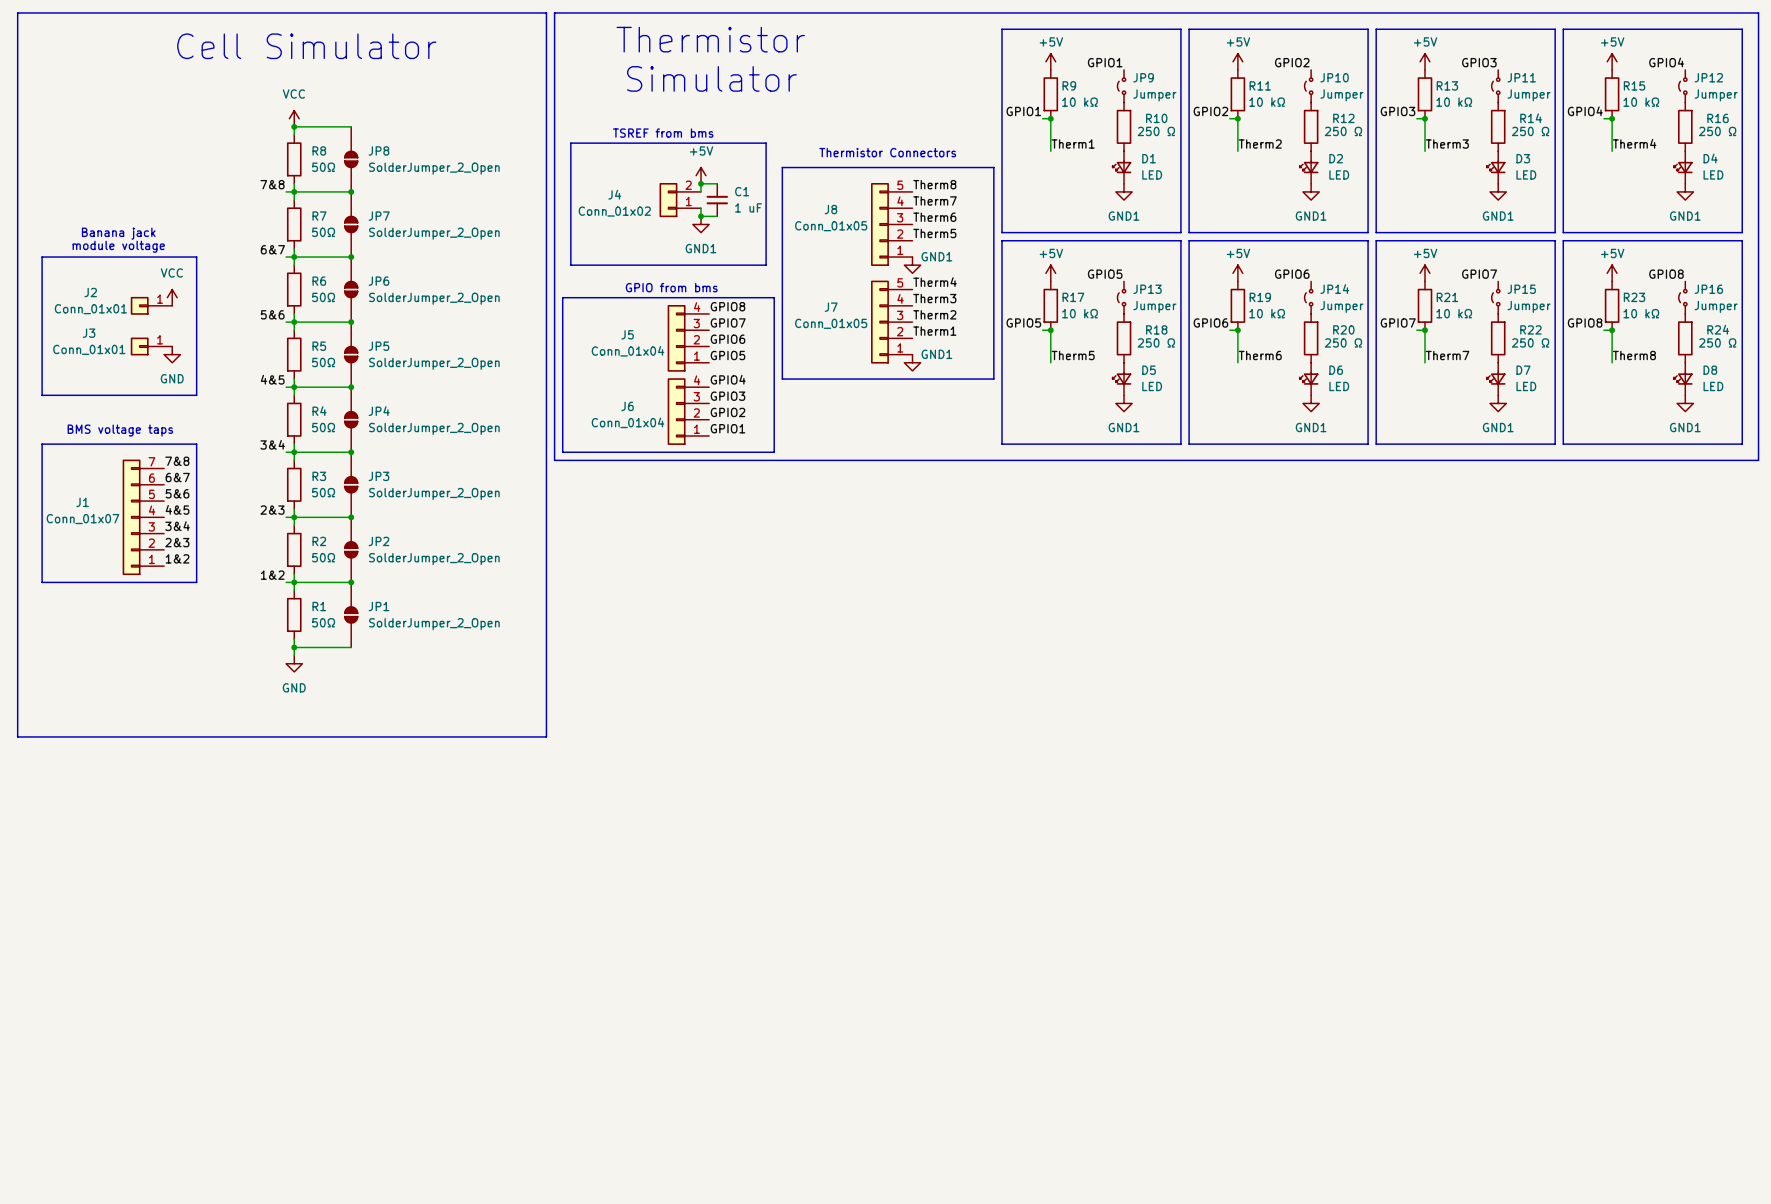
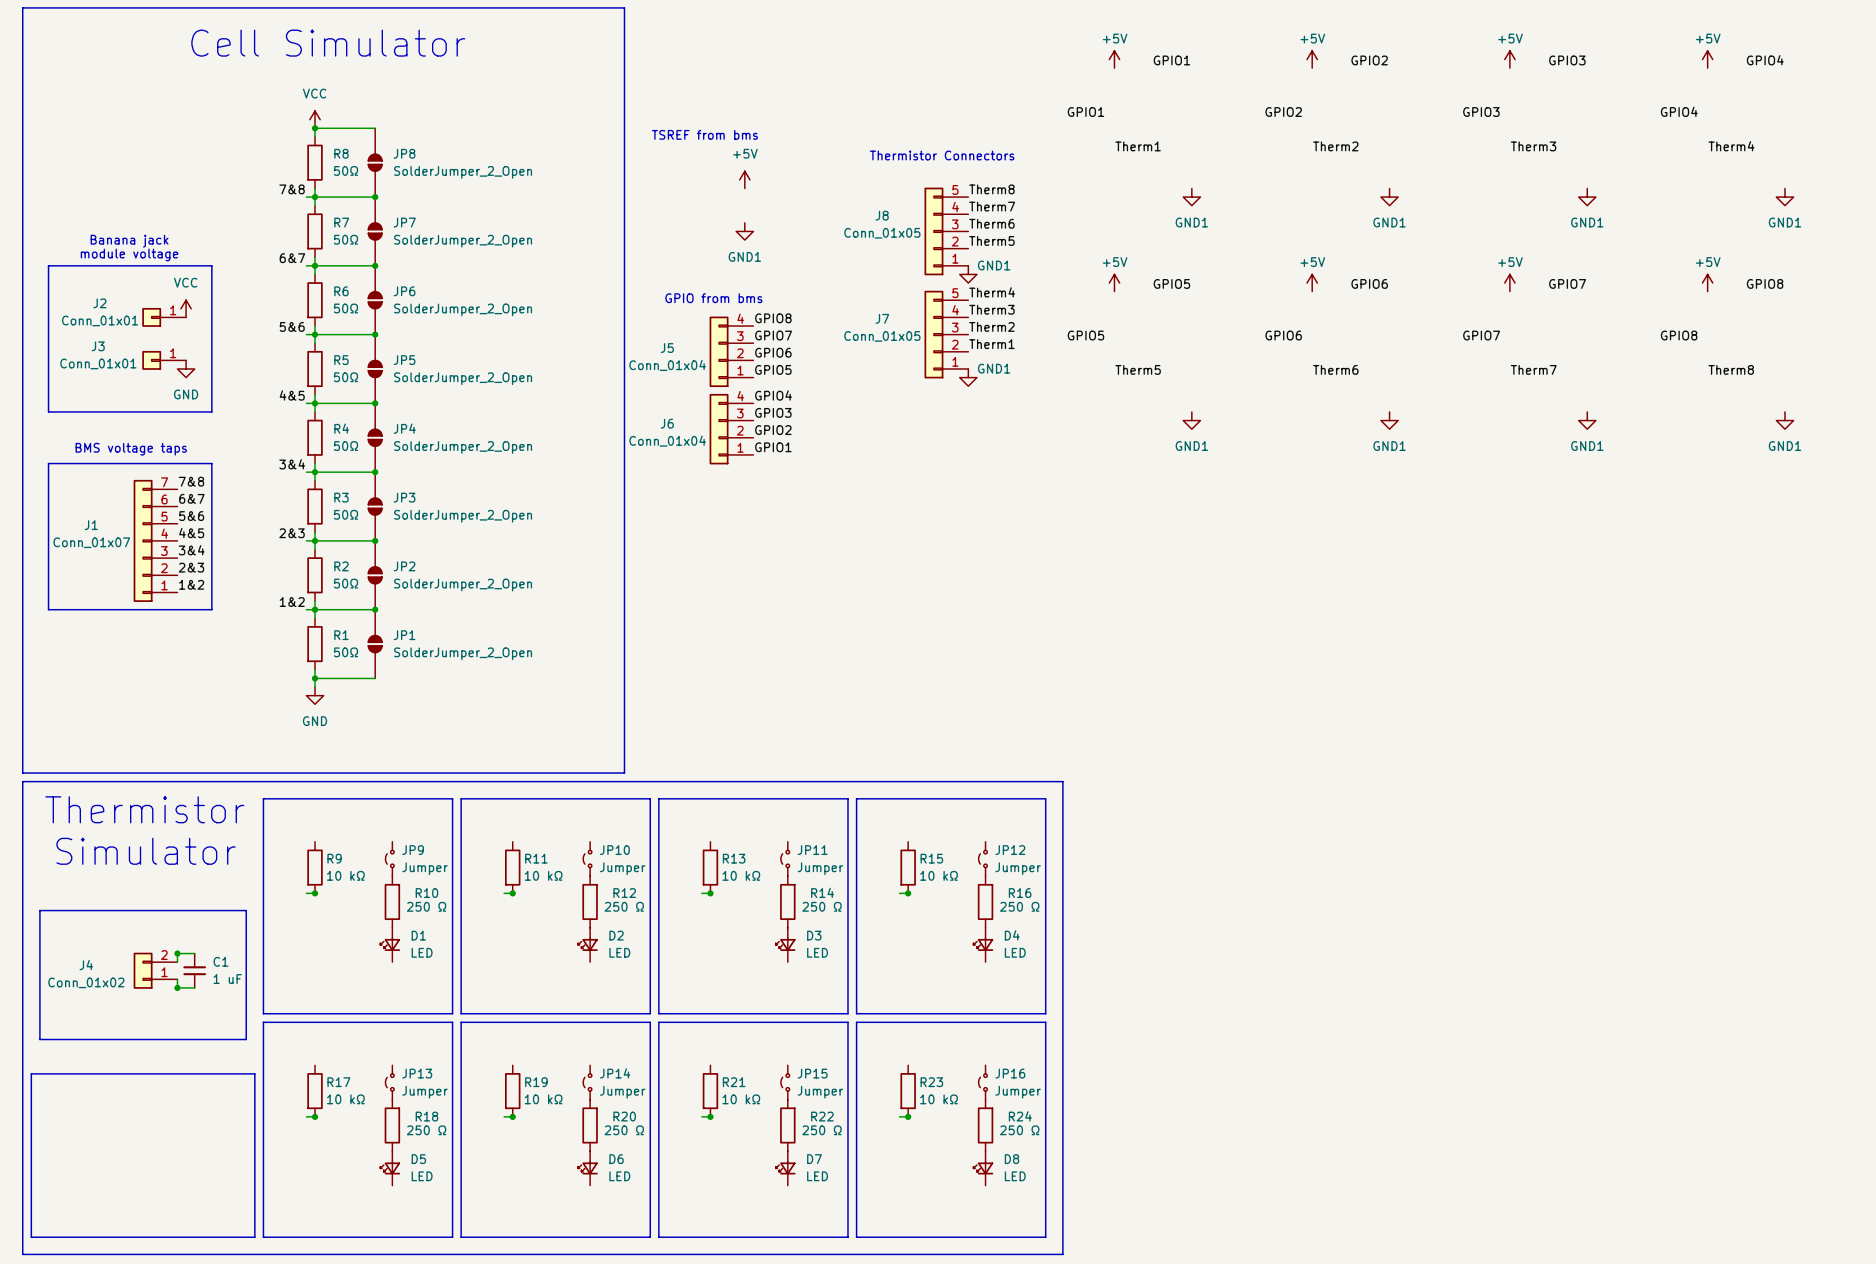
line: (546, 12) (546, 736) -> (624, 7) (624, 773) (581, 773)
line: (554, 12) (554, 460) (1758, 460) (1758, 12) (587, 12) -> (590, 7) (581, 7)
line: (1001, 29) (1180, 29) (1180, 232) (1001, 232) (1001, 29) -> none
line: (1189, 29) (1368, 29) (1368, 232) (1189, 232) (1189, 29) -> none
line: (1376, 29) (1555, 29) (1555, 232) (1376, 232) (1376, 29) -> none
line: (1563, 29) (1742, 29) (1742, 232) (1563, 232) (1563, 29) -> none
text: Thermistor (710, 39) -> none
text: Simulator (711, 78) -> none
JP9 position: (1121, 86) -> (389, 858)
JP10 position: (1308, 86) -> (587, 858)
JP11 position: (1495, 86) -> (785, 858)
JP12 position: (1682, 86) -> (982, 858)
R9 position: (1050, 94) -> (315, 867)
R11 position: (1237, 94) -> (512, 867)
R13 position: (1424, 94) -> (710, 867)
R15 position: (1612, 94) -> (908, 867)
wire: (1042, 118) (1050, 118) (1050, 151) -> none
junction: (1050, 118) -> none
wire: (1229, 118) (1237, 118) (1237, 151) -> none
junction: (1237, 118) -> none
wire: (1416, 118) (1424, 118) (1424, 151) -> none
junction: (1424, 118) -> none
wire: (1603, 118) (1612, 118) (1612, 151) -> none
junction: (1612, 118) -> none
R10 position: (1124, 126) -> (392, 901)
R12 position: (1311, 126) -> (590, 901)
R14 position: (1498, 126) -> (787, 901)
R16 position: (1685, 126) -> (985, 901)
line: (570, 143) (766, 143) (766, 265) (570, 265) (570, 143) -> none
line: (782, 167) (993, 167) (993, 379) (782, 379) (782, 167) -> none
D1 position: (1121, 167) -> (390, 944)
D2 position: (1309, 167) -> (587, 944)
D3 position: (1496, 167) -> (785, 944)
D4 position: (1683, 167) -> (983, 944)
junction: (701, 183) -> none
wire: (717, 183) (701, 183) (701, 191) -> none
J4 position: (680, 200) -> (155, 970)
C1 position: (717, 200) -> (194, 970)
wire: (701, 208) (701, 216) (717, 216) -> none
junction: (701, 216) -> none
line: (1001, 240) (1180, 240) (1180, 444) (1001, 444) (1001, 240) -> none
line: (1189, 240) (1368, 240) (1368, 444) (1189, 444) (1189, 240) -> none
line: (1376, 240) (1555, 240) (1555, 444) (1376, 444) (1376, 240) -> none
line: (1563, 240) (1563, 444) (1742, 444) (1742, 240) (1563, 240) -> none
line: (562, 297) (774, 297) (774, 452) (562, 452) (562, 297) -> none
JP13 position: (1121, 297) -> (389, 1082)
JP14 position: (1308, 297) -> (587, 1082)
JP15 position: (1495, 297) -> (785, 1082)
JP16 position: (1682, 297) -> (982, 1082)
R17 position: (1050, 305) -> (315, 1091)
R19 position: (1237, 305) -> (512, 1091)
R21 position: (1424, 305) -> (710, 1091)
R23 position: (1612, 305) -> (908, 1091)
wire: (1042, 330) (1050, 330) (1050, 362) -> none
junction: (1050, 330) -> none
wire: (1229, 330) (1237, 330) (1237, 362) -> none
junction: (1237, 330) -> none
wire: (1416, 330) (1424, 330) (1424, 362) -> none
junction: (1424, 330) -> none
wire: (1603, 330) (1612, 330) (1612, 362) -> none
junction: (1612, 330) -> none
R18 position: (1124, 338) -> (392, 1125)
R20 position: (1311, 338) -> (590, 1125)
R22 position: (1498, 338) -> (787, 1125)
R24 position: (1685, 338) -> (985, 1125)
D5 position: (1121, 379) -> (390, 1168)
D6 position: (1309, 379) -> (587, 1168)
D7 position: (1496, 379) -> (785, 1168)
D8 position: (1683, 379) -> (983, 1168)
line: none -> (22, 781) (22, 1254) (1062, 1254) (1062, 781) (22, 781)
line: none -> (263, 798) (452, 798) (452, 1013) (263, 1013) (263, 798)
line: none -> (461, 798) (650, 798) (650, 1013) (461, 1013) (461, 798)
line: none -> (658, 798) (847, 798) (847, 1013) (658, 1013) (658, 798)
line: none -> (856, 798) (1045, 798) (1045, 1013) (856, 1013) (856, 798)
text: none -> Thermistor (144, 809)
text: none -> Simulator (146, 851)
wire: none -> (306, 893) (315, 893)
junction: none -> (315, 893)
wire: none -> (504, 893) (512, 893)
junction: none -> (512, 893)
wire: none -> (701, 893) (710, 893)
junction: none -> (710, 893)
wire: none -> (899, 893) (908, 893)
junction: none -> (908, 893)
line: none -> (39, 910) (246, 910) (246, 1039) (39, 1039) (39, 910)
junction: none -> (177, 953)
wire: none -> (194, 953) (177, 953) (177, 962)
wire: none -> (177, 979) (177, 987) (194, 987)
junction: none -> (177, 987)
line: none -> (263, 1022) (452, 1022) (452, 1237) (263, 1237) (263, 1022)
line: none -> (461, 1022) (650, 1022) (650, 1237) (461, 1237) (461, 1022)
line: none -> (658, 1022) (847, 1022) (847, 1237) (658, 1237) (658, 1022)
line: none -> (856, 1022) (856, 1237) (1045, 1237) (1045, 1022) (856, 1022)
line: none -> (31, 1073) (254, 1073) (254, 1237) (31, 1237) (31, 1073)
wire: none -> (306, 1116) (315, 1116)
junction: none -> (315, 1116)
wire: none -> (504, 1116) (512, 1116)
junction: none -> (512, 1116)
wire: none -> (701, 1116) (710, 1116)
junction: none -> (710, 1116)
wire: none -> (899, 1116) (908, 1116)
junction: none -> (908, 1116)

